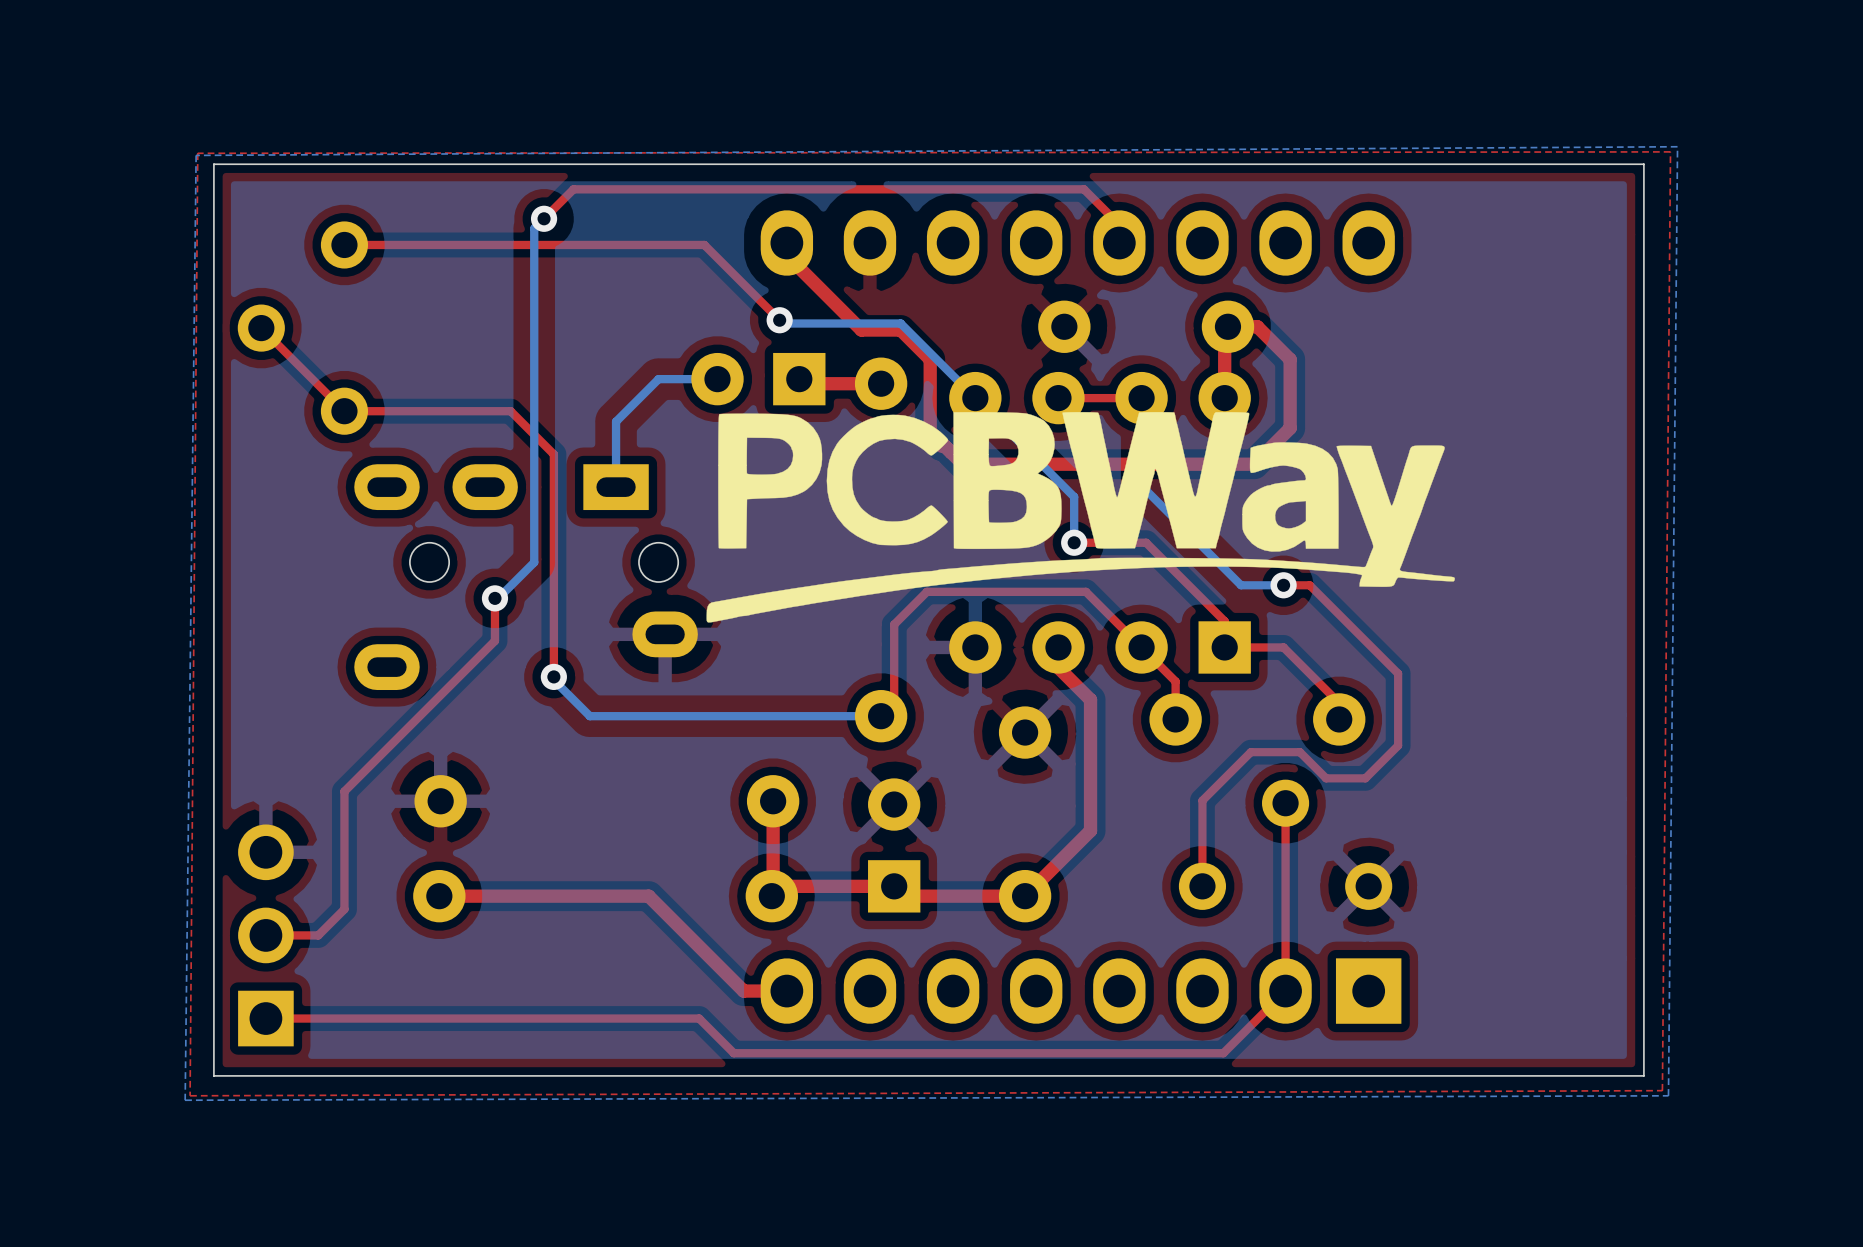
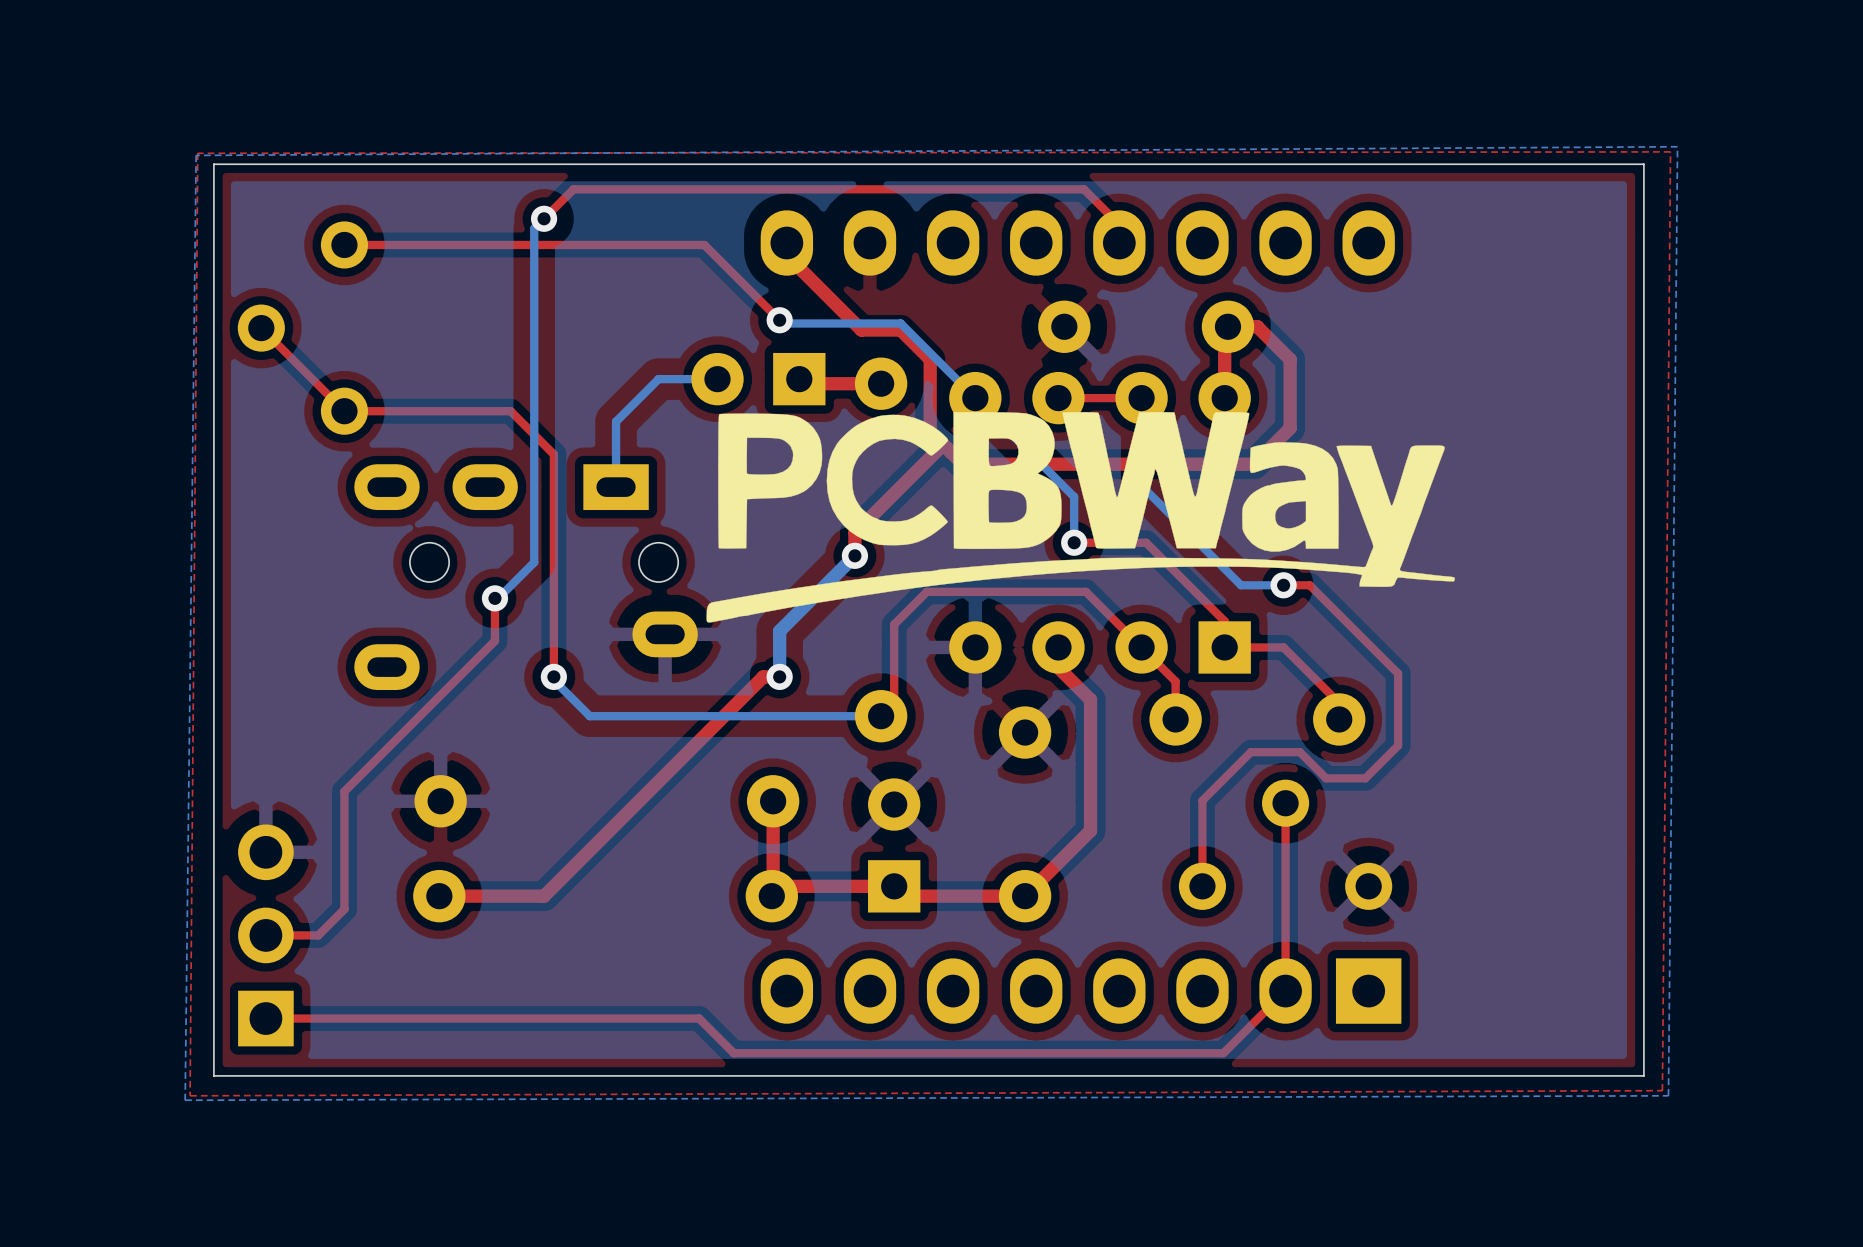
top track: none -> (941, 446) (854, 532) (854, 555)
bottom track: none -> (854, 555) (779, 631) (779, 676)
via: none -> (854, 555)
via: none -> (779, 676)
top track: (544, 896) (648, 896) (743, 991) (786, 991) -> (544, 896) (763, 676) (779, 676)

